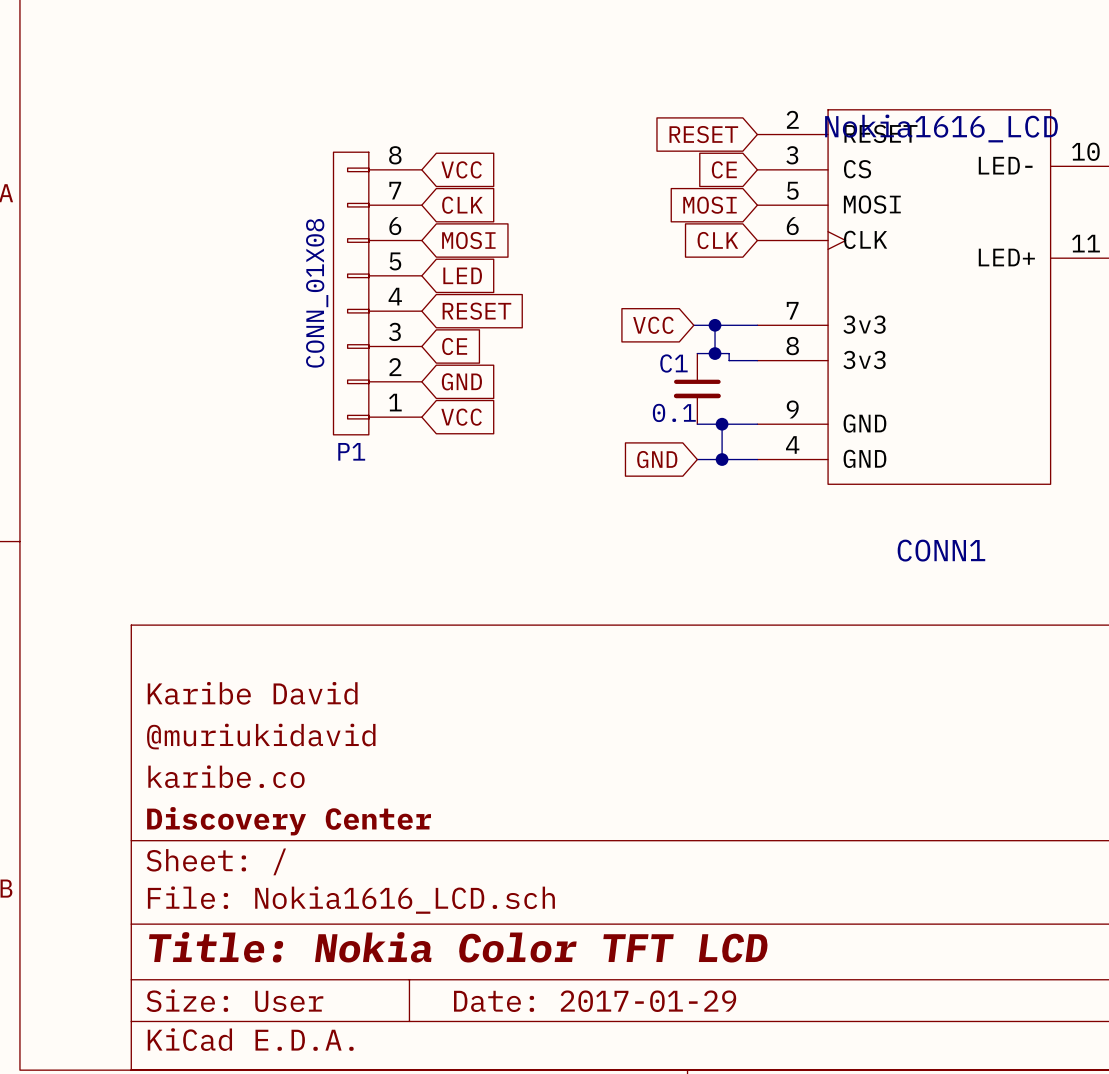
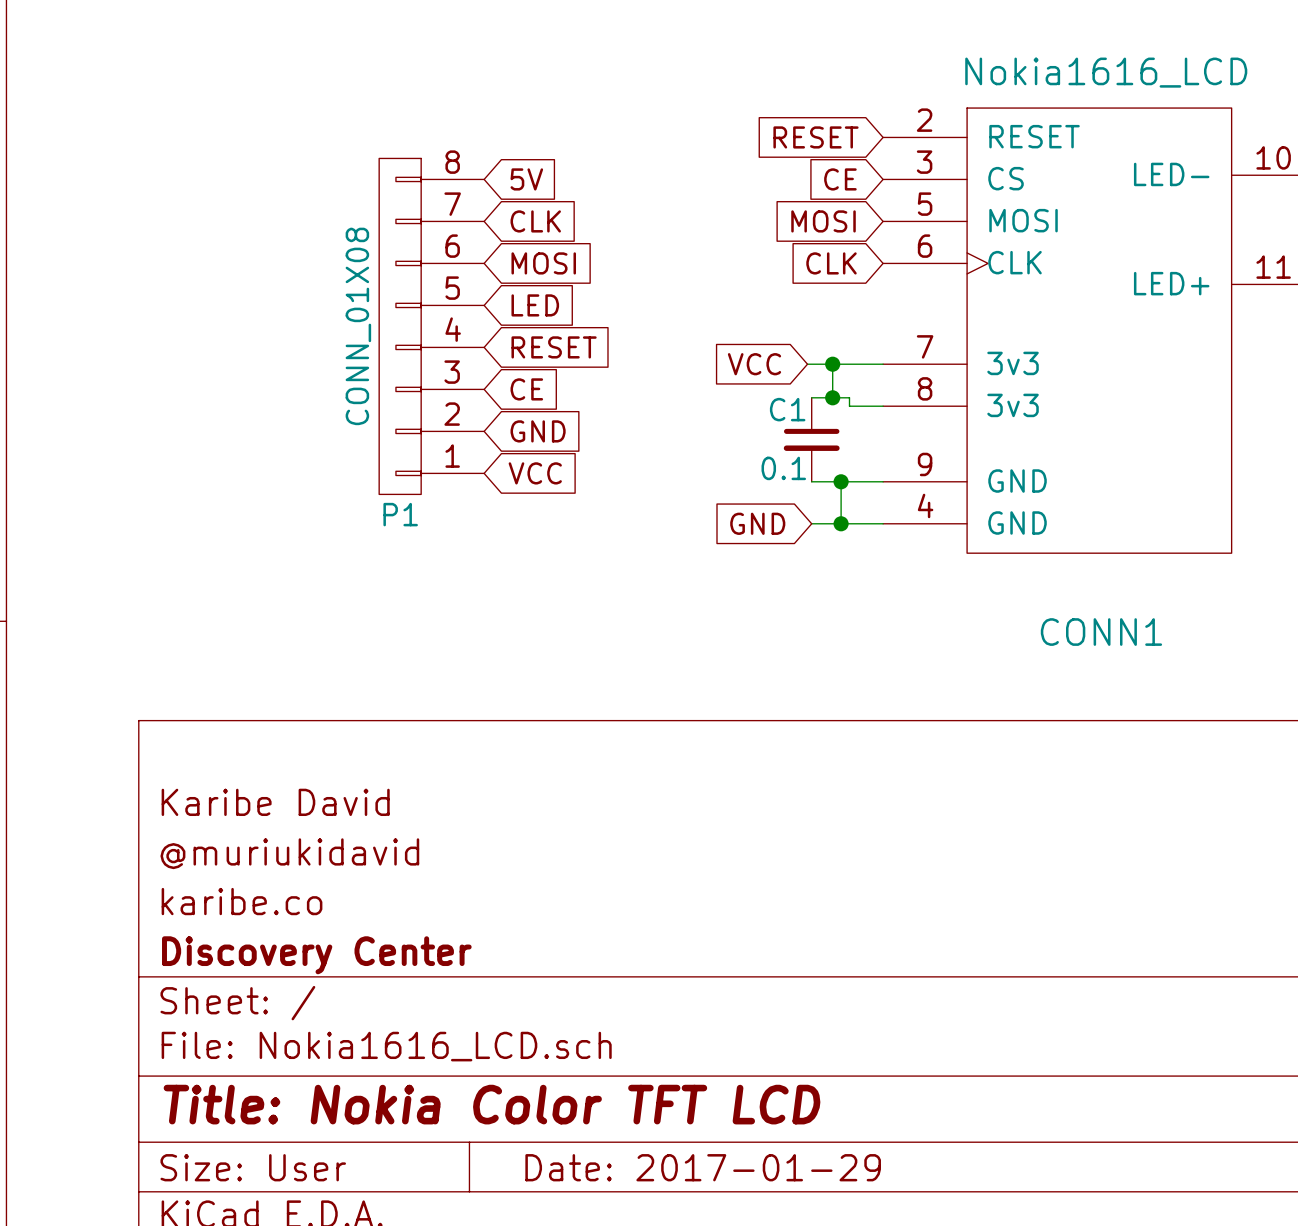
CONN1 value position: Nokia1616_LCD (941, 128) -> Nokia1616_LCD (1106, 72)
global label: VCC (461, 169) -> 5V (526, 179)

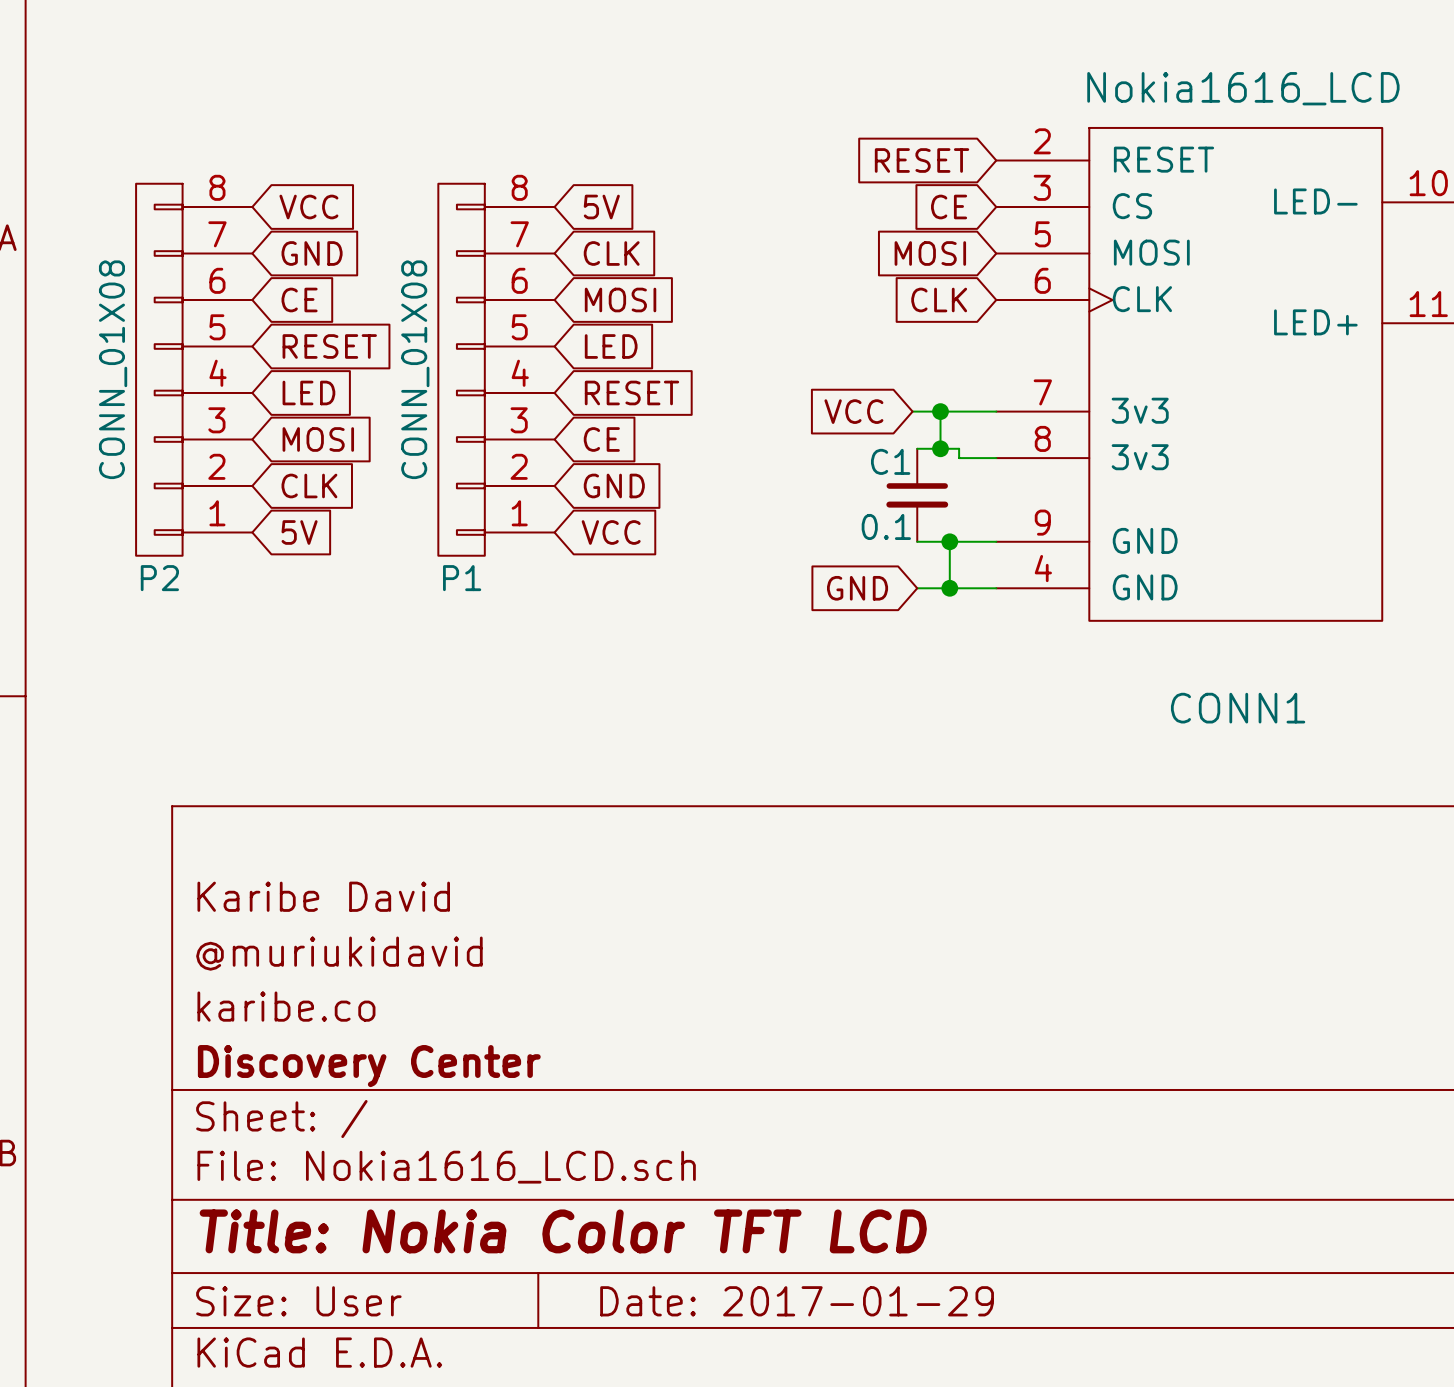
global label: none -> VCC (308, 207)
global label: none -> GND (312, 253)
global label: none -> CE (299, 299)
global label: none -> RESET (329, 346)
P2: none -> CONN_01X08 (194, 369)
global label: none -> LED (308, 392)
global label: none -> MOSI (318, 439)
global label: none -> CLK (309, 485)
global label: none -> 5V (299, 532)

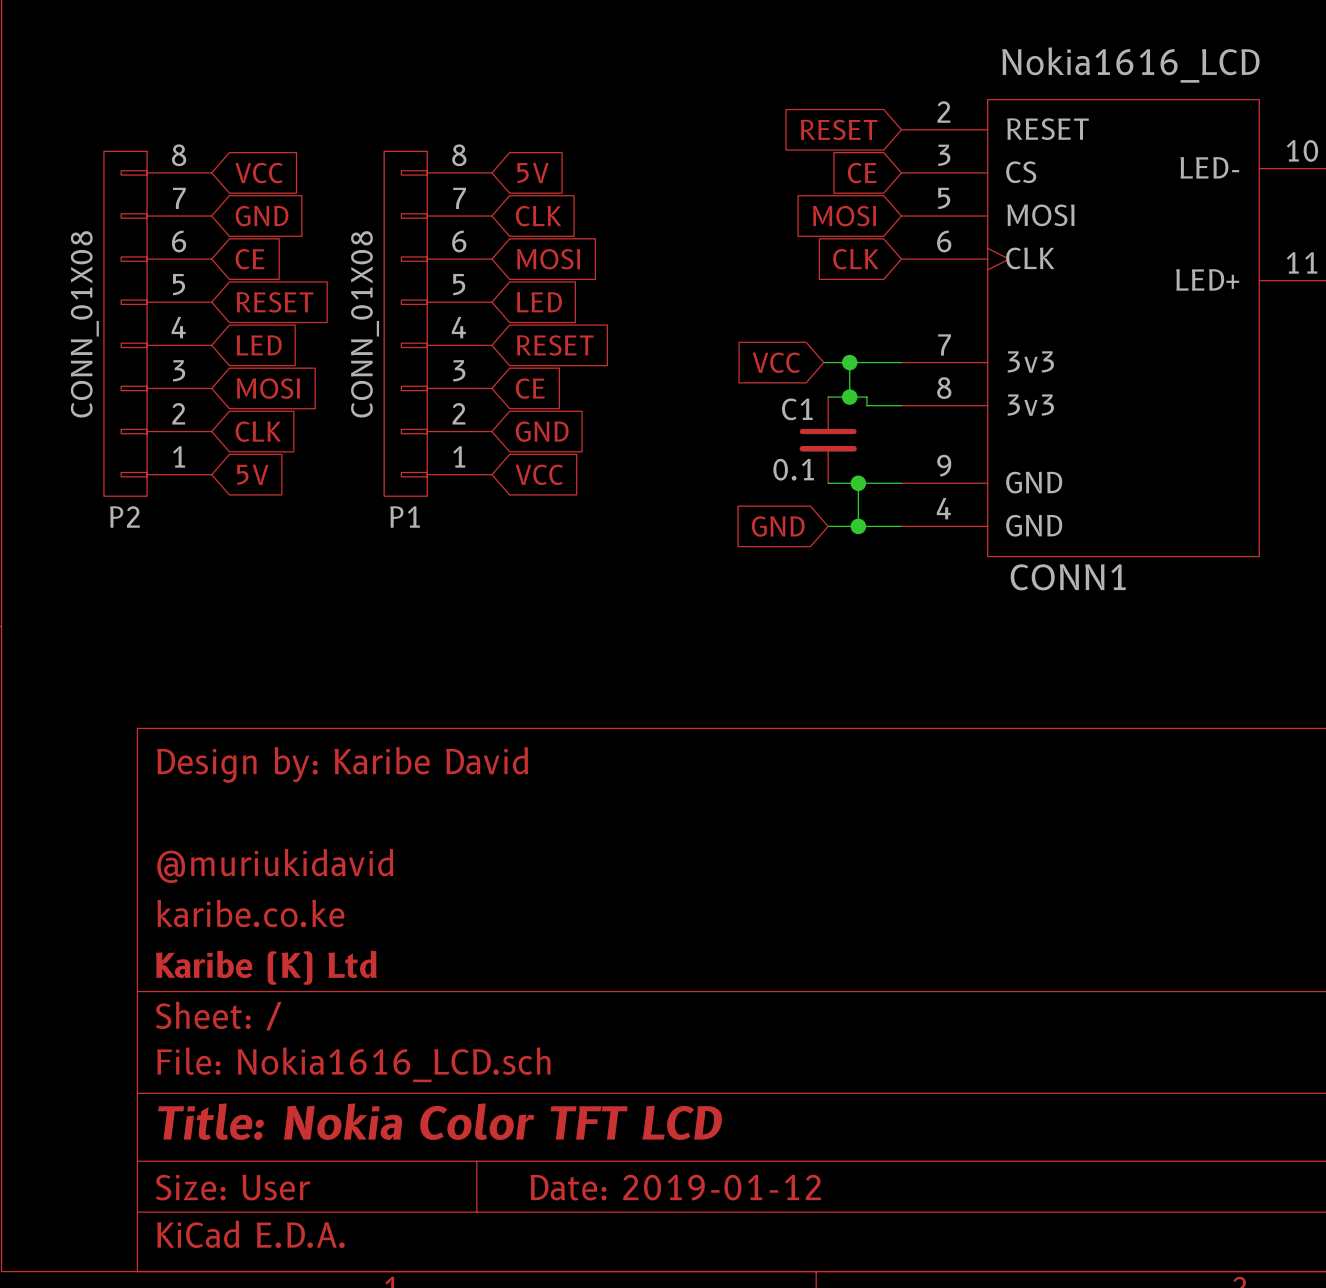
CONN1 name position: CONN1 (1238, 708) -> CONN1 (1068, 577)
title block: Karibe David (323, 896) -> Design by: Karibe David (342, 764)
title block: karibe.co (286, 1006) -> karibe.co.ke (250, 913)
title block: Discovery Center (369, 1066) -> Karibe (K) Ltd (266, 967)
title block: Date: 2017-01-29 (797, 1301) -> Date: 2019-01-12 (675, 1187)

